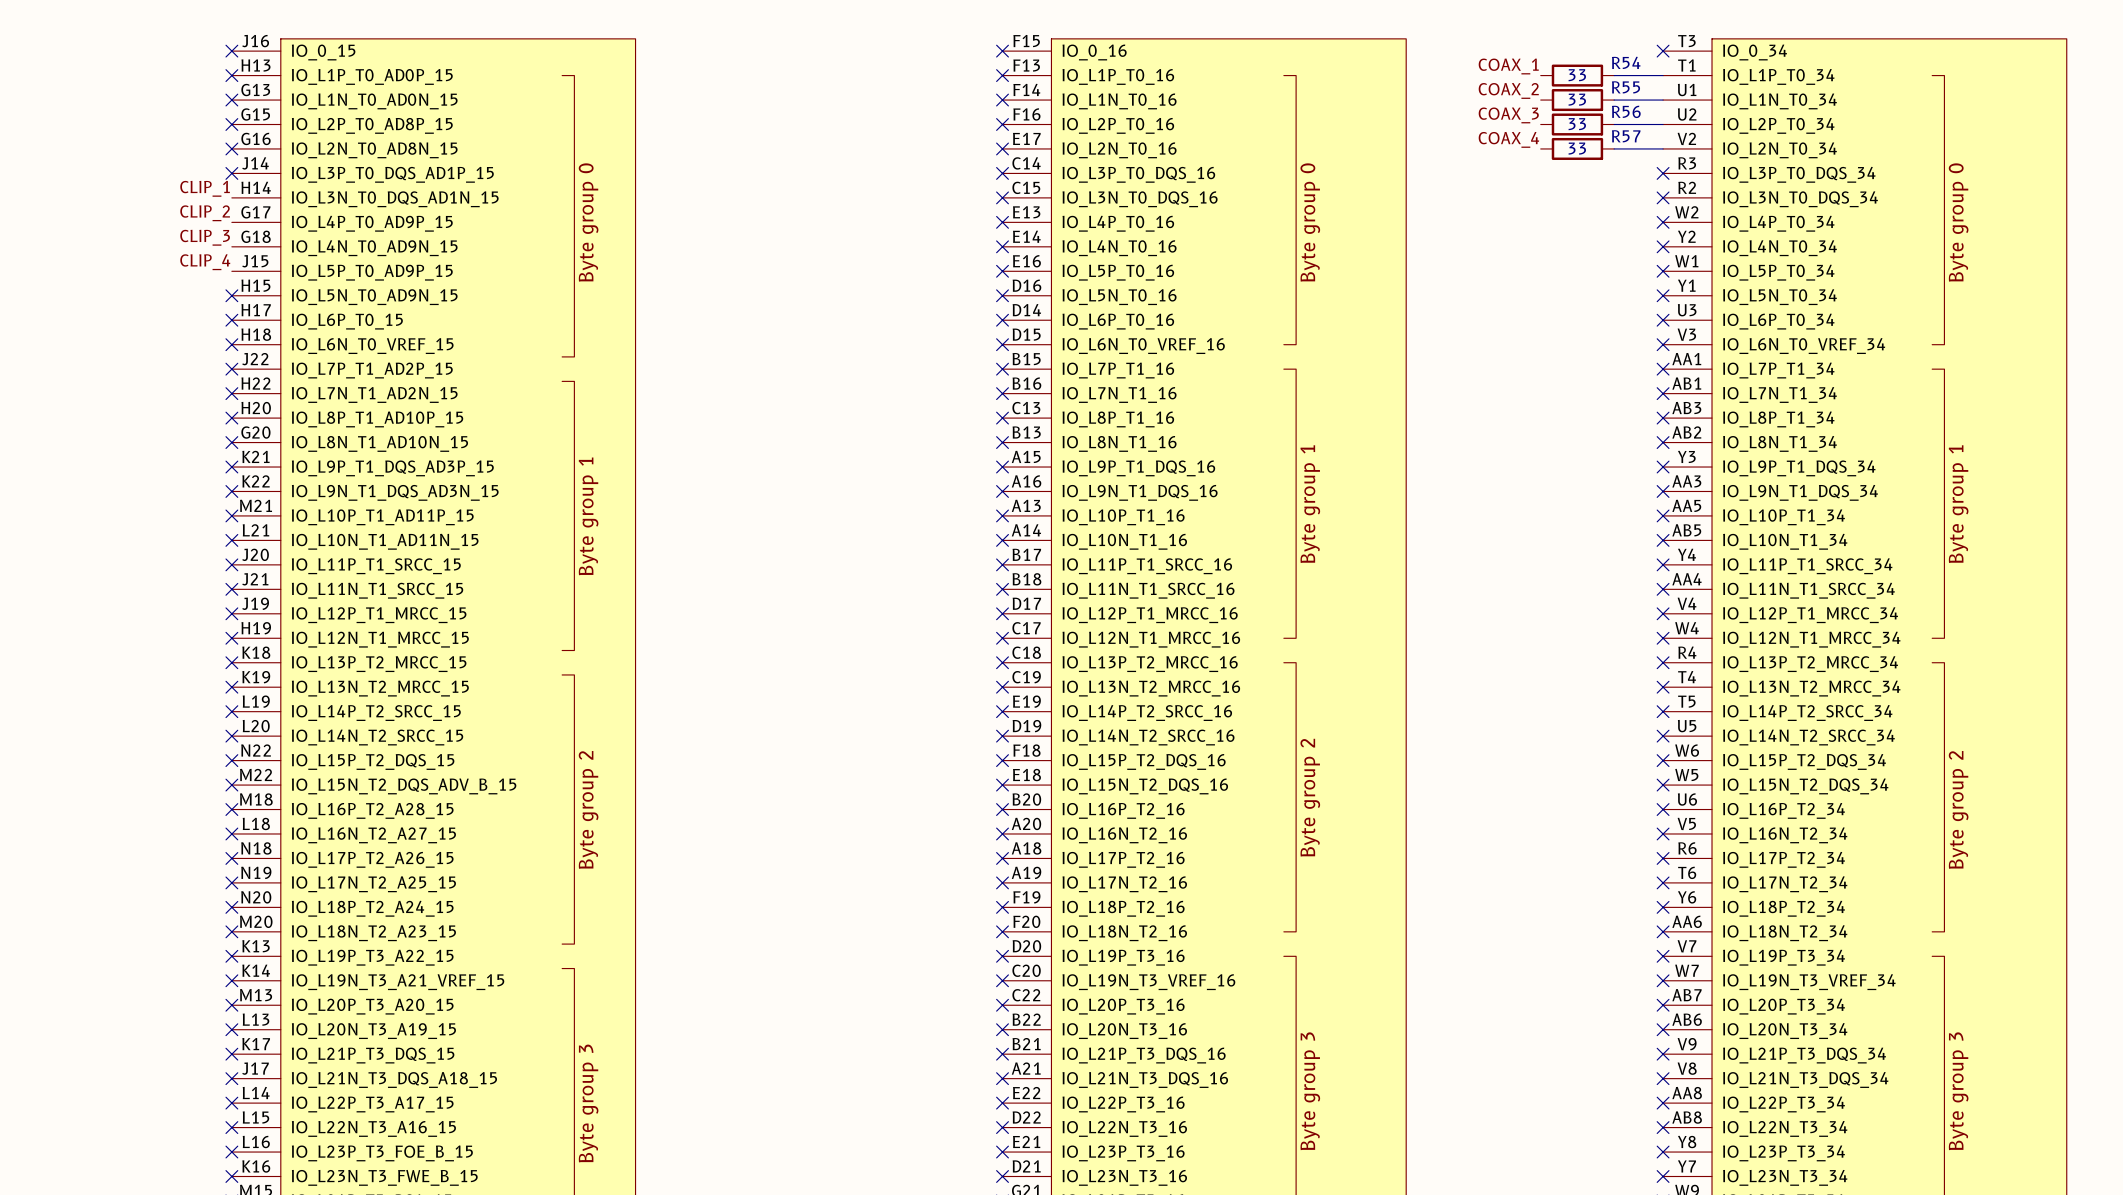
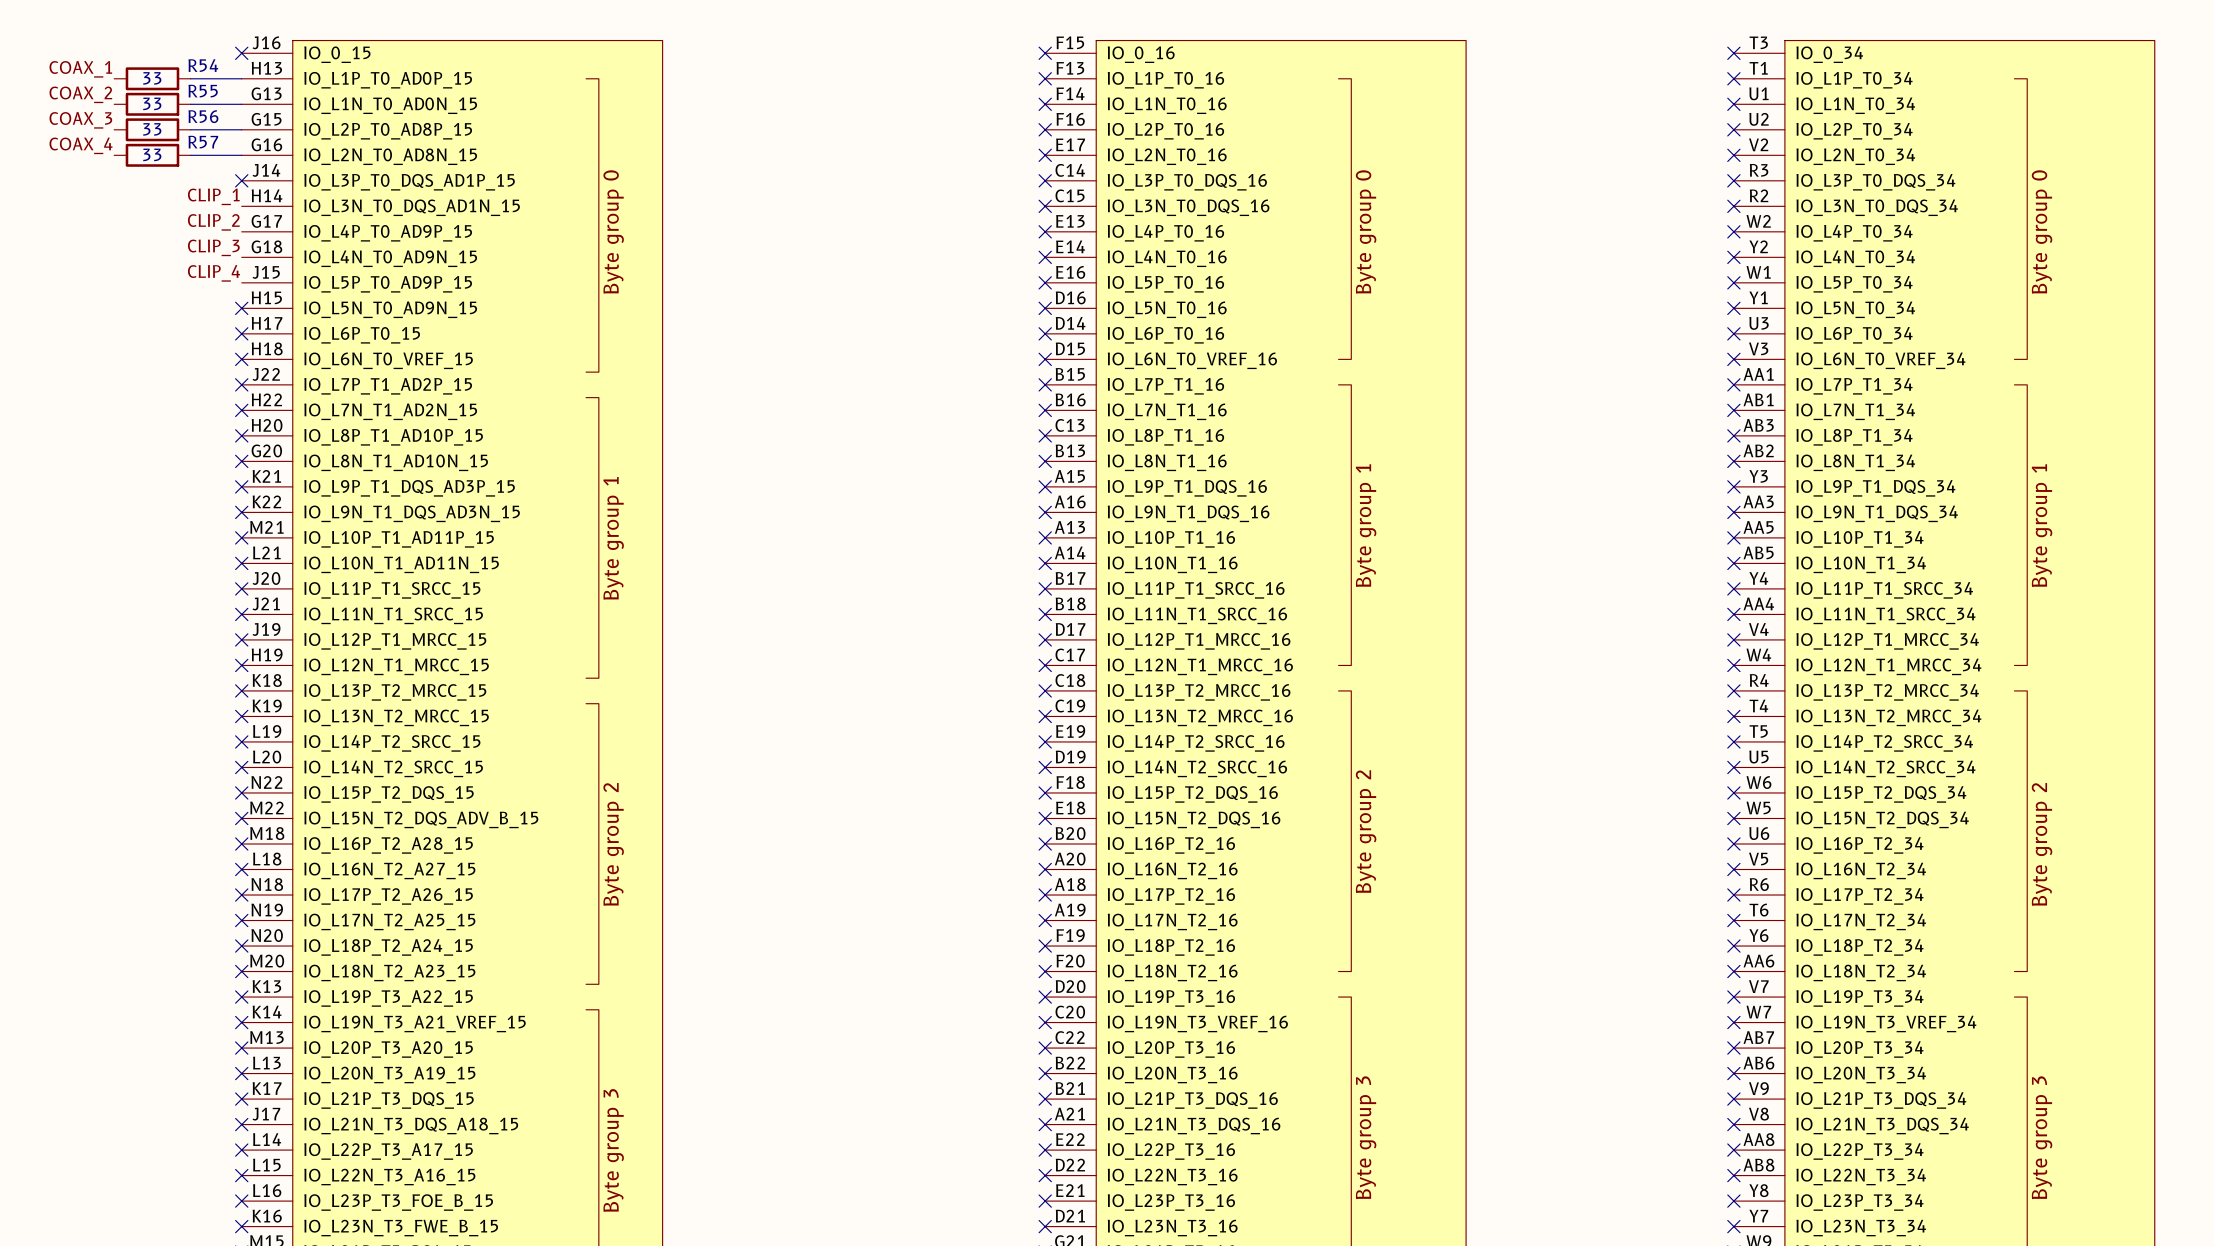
label: none -> COAX_1 (80, 69)
label: COAX_1 (1508, 66) -> none
wire: none -> (190, 78) (241, 78)
no-connect mark: (231, 75) -> none
R54 position: (1577, 75) -> (152, 78)
wire: (1614, 75) (1663, 75) -> none
no-connect mark: none -> (1733, 78)
label: none -> COAX_2 (80, 94)
label: COAX_2 (1508, 90) -> none
wire: none -> (190, 104) (241, 104)
no-connect mark: (231, 100) -> none
R55 position: (1577, 100) -> (152, 104)
wire: (1614, 100) (1663, 100) -> none
no-connect mark: none -> (1733, 104)
label: none -> COAX_3 (80, 120)
label: COAX_3 (1508, 115) -> none
wire: none -> (190, 129) (241, 129)
no-connect mark: (231, 124) -> none
R56 position: (1577, 124) -> (152, 129)
wire: (1614, 124) (1663, 124) -> none
no-connect mark: none -> (1733, 129)
label: none -> COAX_4 (81, 145)
label: COAX_4 (1508, 139) -> none
wire: none -> (190, 155) (241, 155)
no-connect mark: (231, 148) -> none
R57 position: (1577, 148) -> (152, 155)
wire: (1614, 148) (1663, 148) -> none
no-connect mark: none -> (1733, 155)

